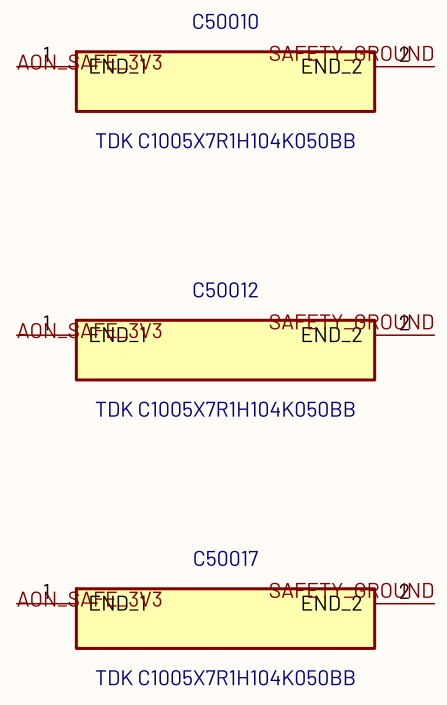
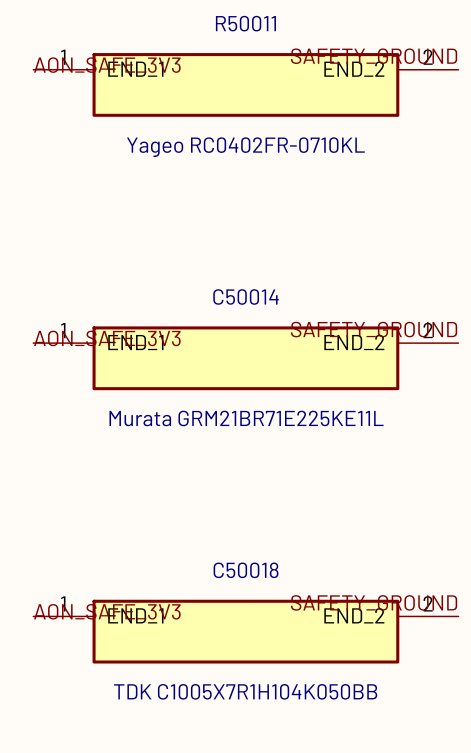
C50010 name: C50010 (225, 21) -> R50011 (245, 23)
C50010 value: TDK C1005X7R1H104K050BB (225, 140) -> Yageo RC0402FR-0710KL (245, 147)
C50012 name: C50012 (225, 289) -> C50014 (246, 296)
C50012 value: TDK C1005X7R1H104K050BB (225, 409) -> Murata GRM21BR71E225KE11L (246, 418)
C50017 name: C50017 (226, 558) -> C50018 (246, 570)

